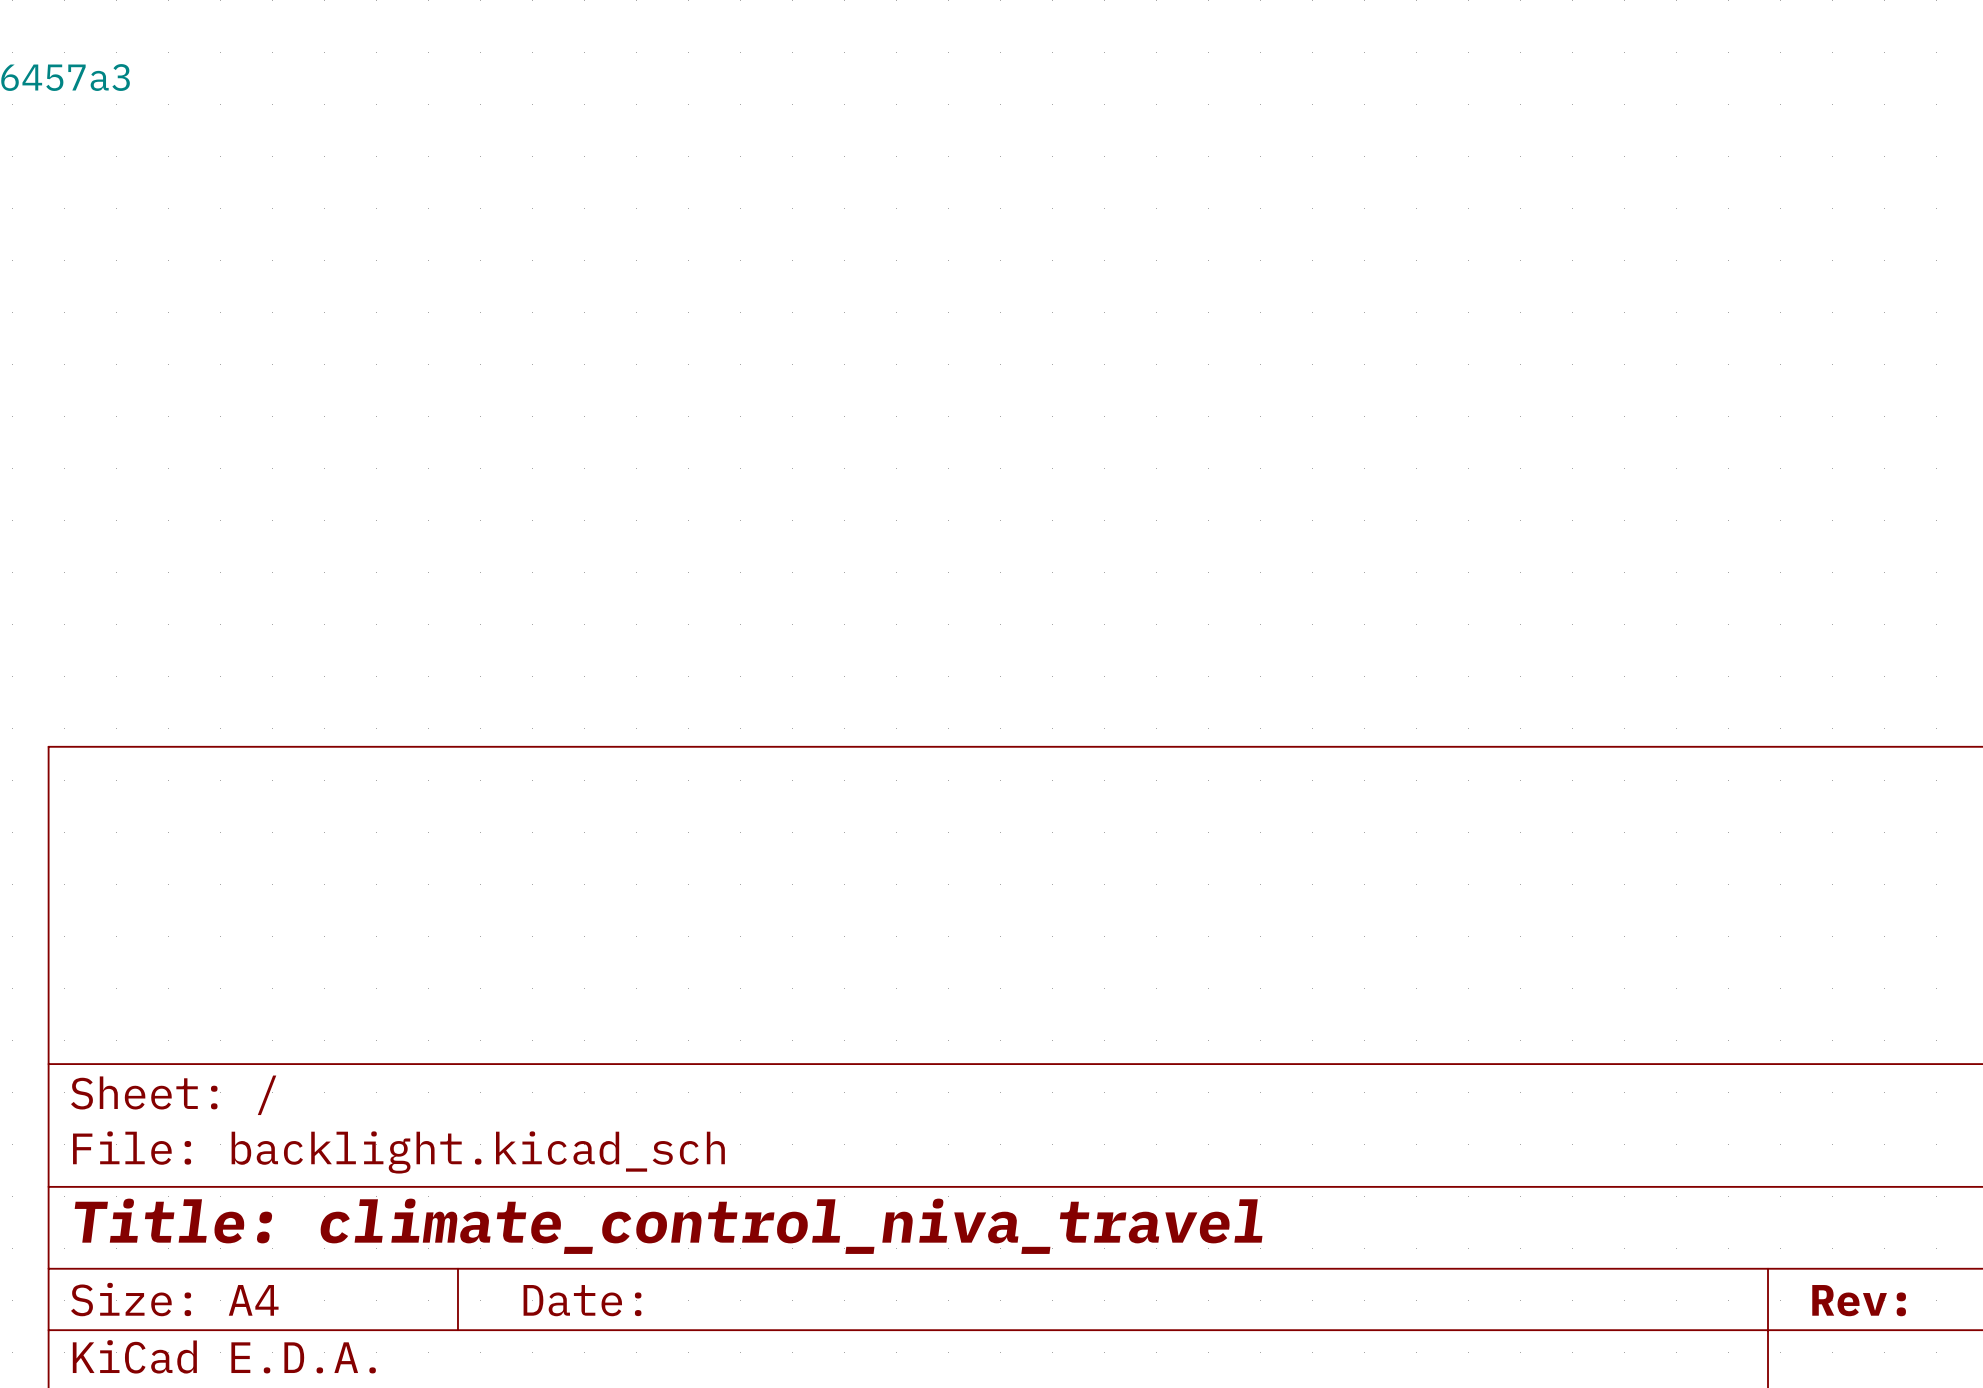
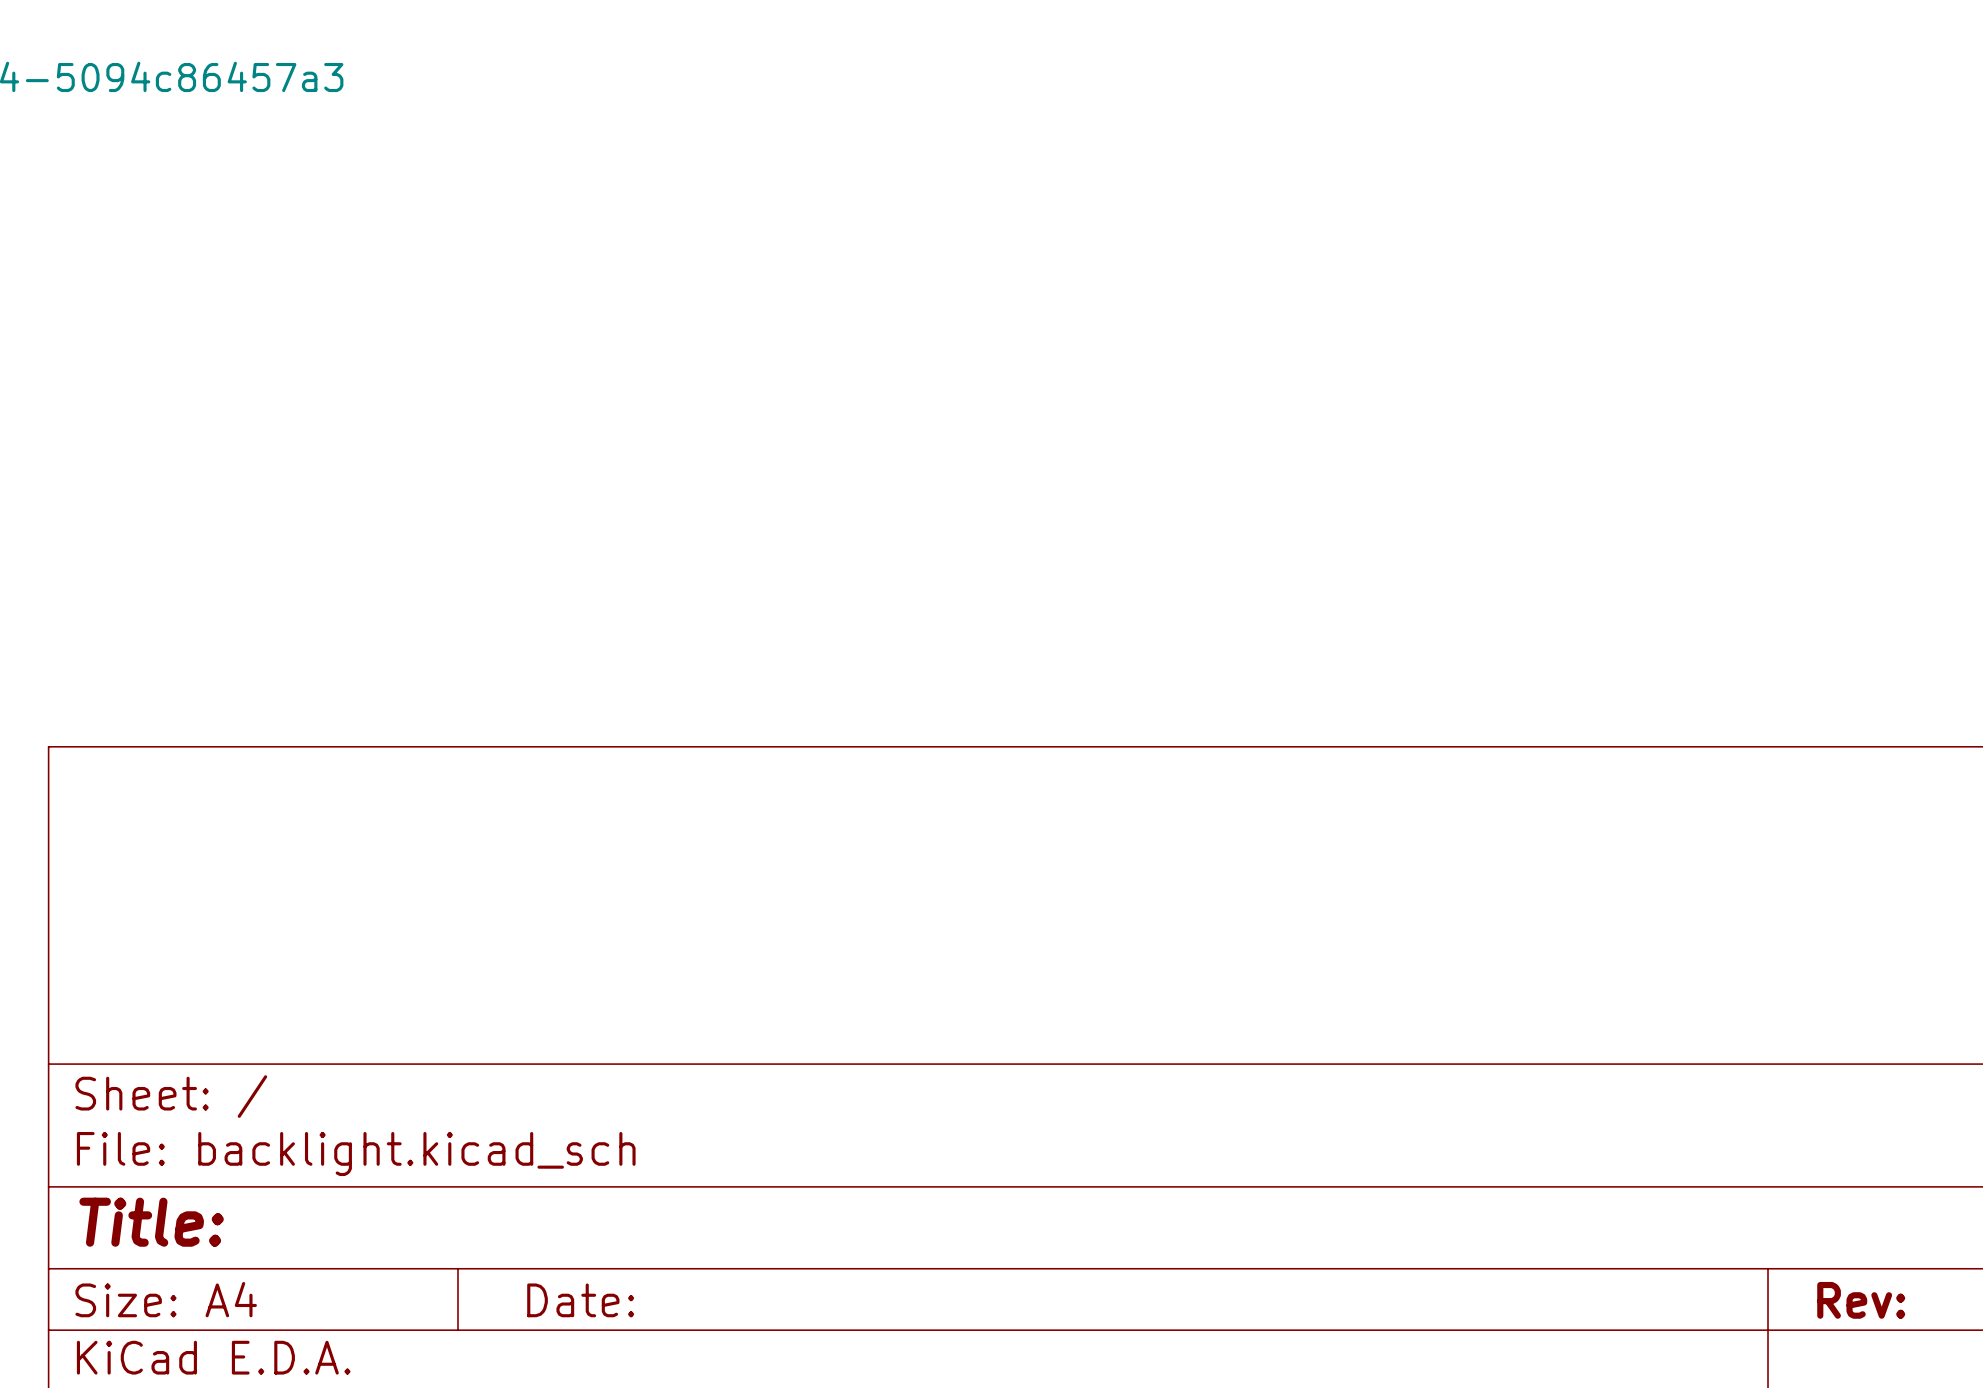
title block: Title: climate_control_niva_travel (668, 1226) -> Title: (151, 1222)

